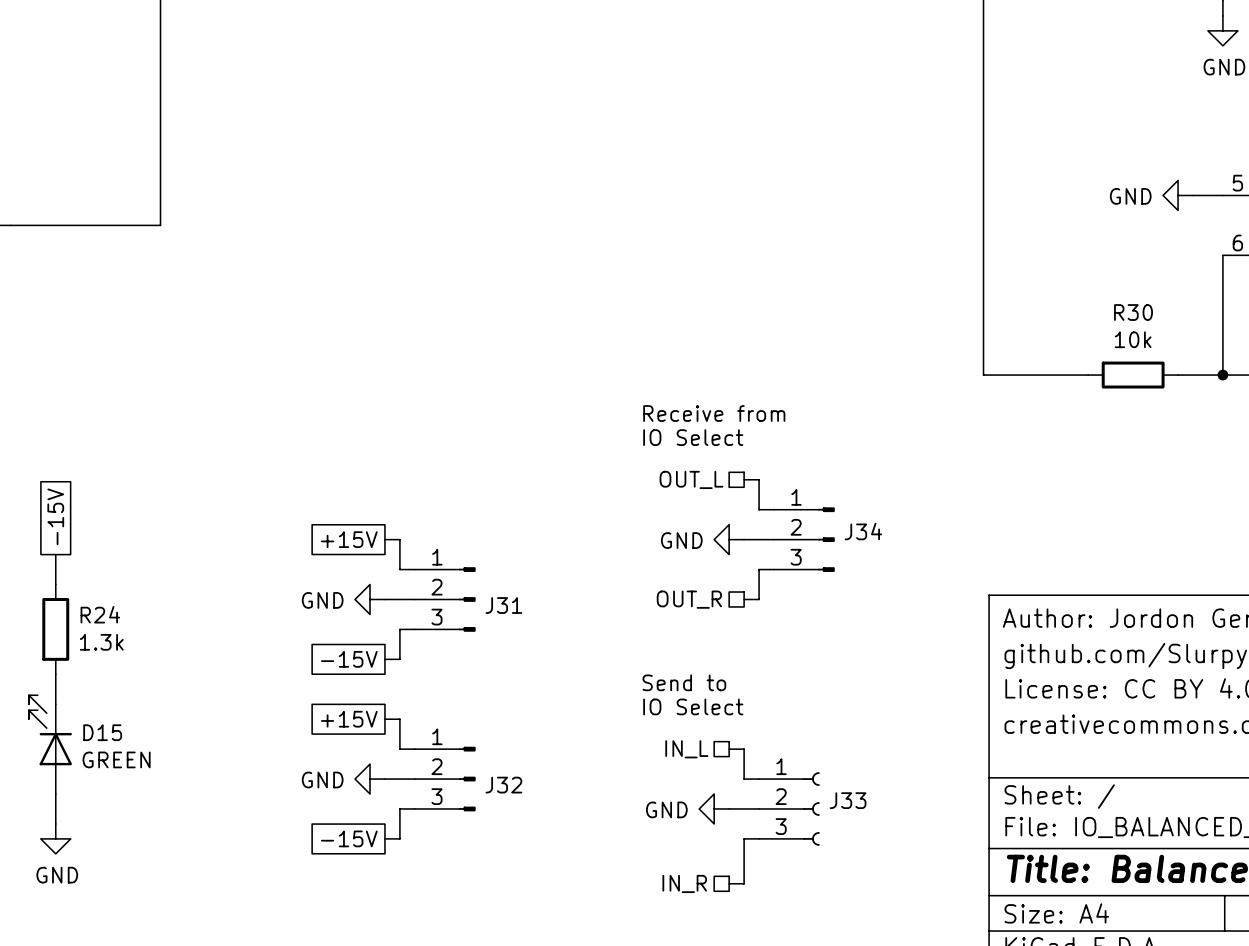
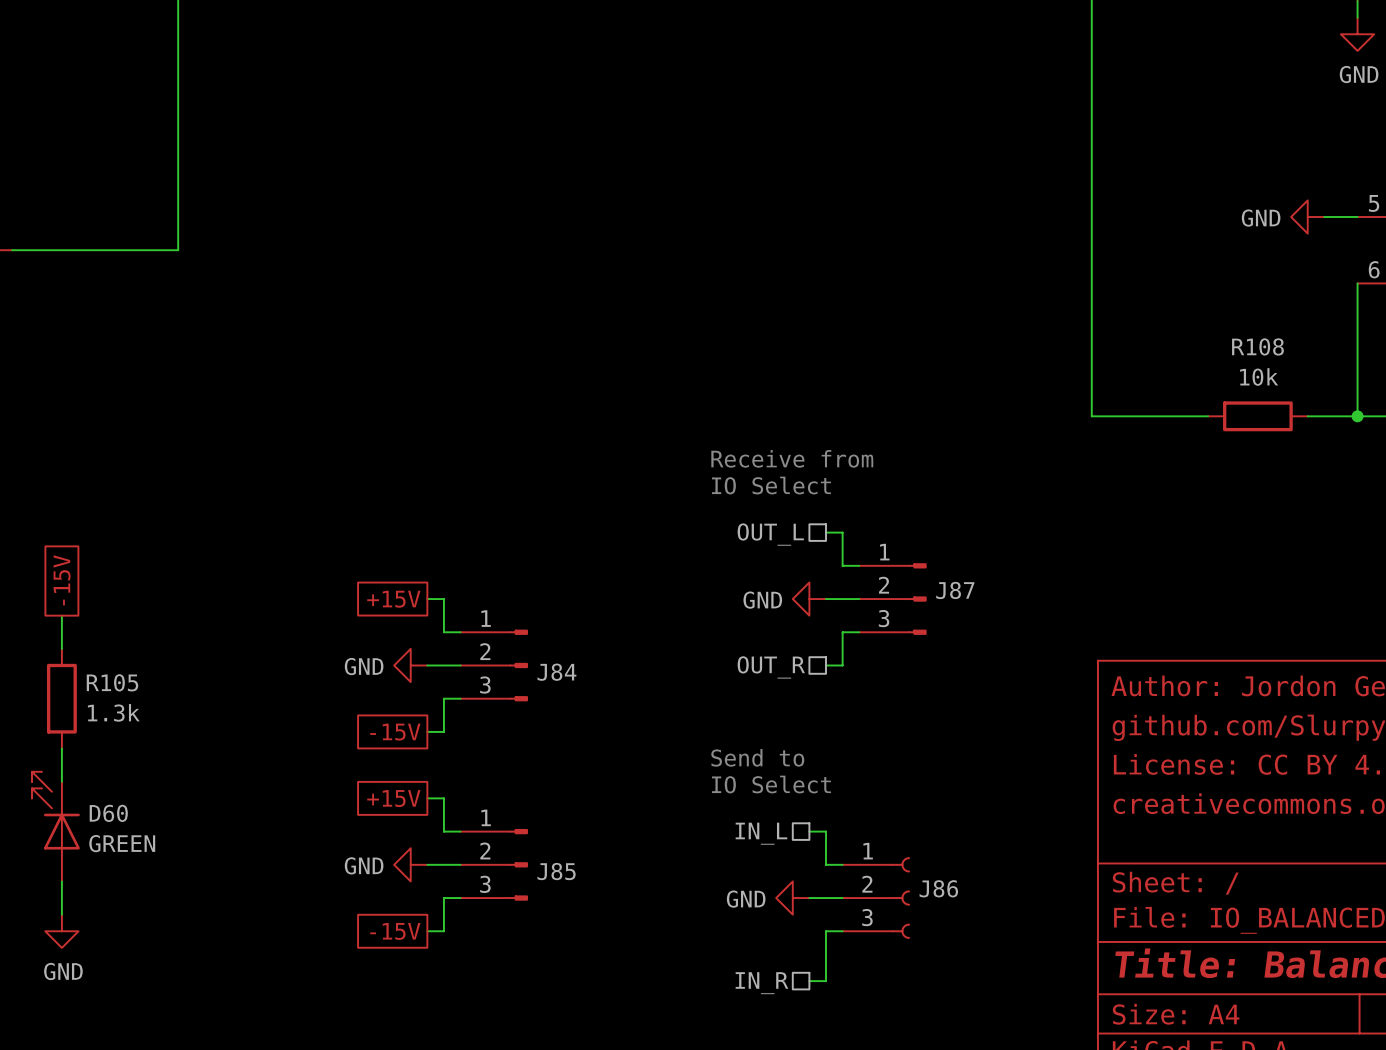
R30 name: R30 (1133, 312) -> R108 (1257, 346)
J34 name: J34 (863, 531) -> J87 (955, 590)
J31 name: J31 (503, 605) -> J84 (556, 672)
R24 name: R24 (100, 614) -> R105 (112, 682)
D15 name: D15 (102, 732) -> D60 (108, 813)
J32 name: J32 (503, 785) -> J85 (556, 871)
J33 name: J33 (848, 800) -> J86 (938, 888)

